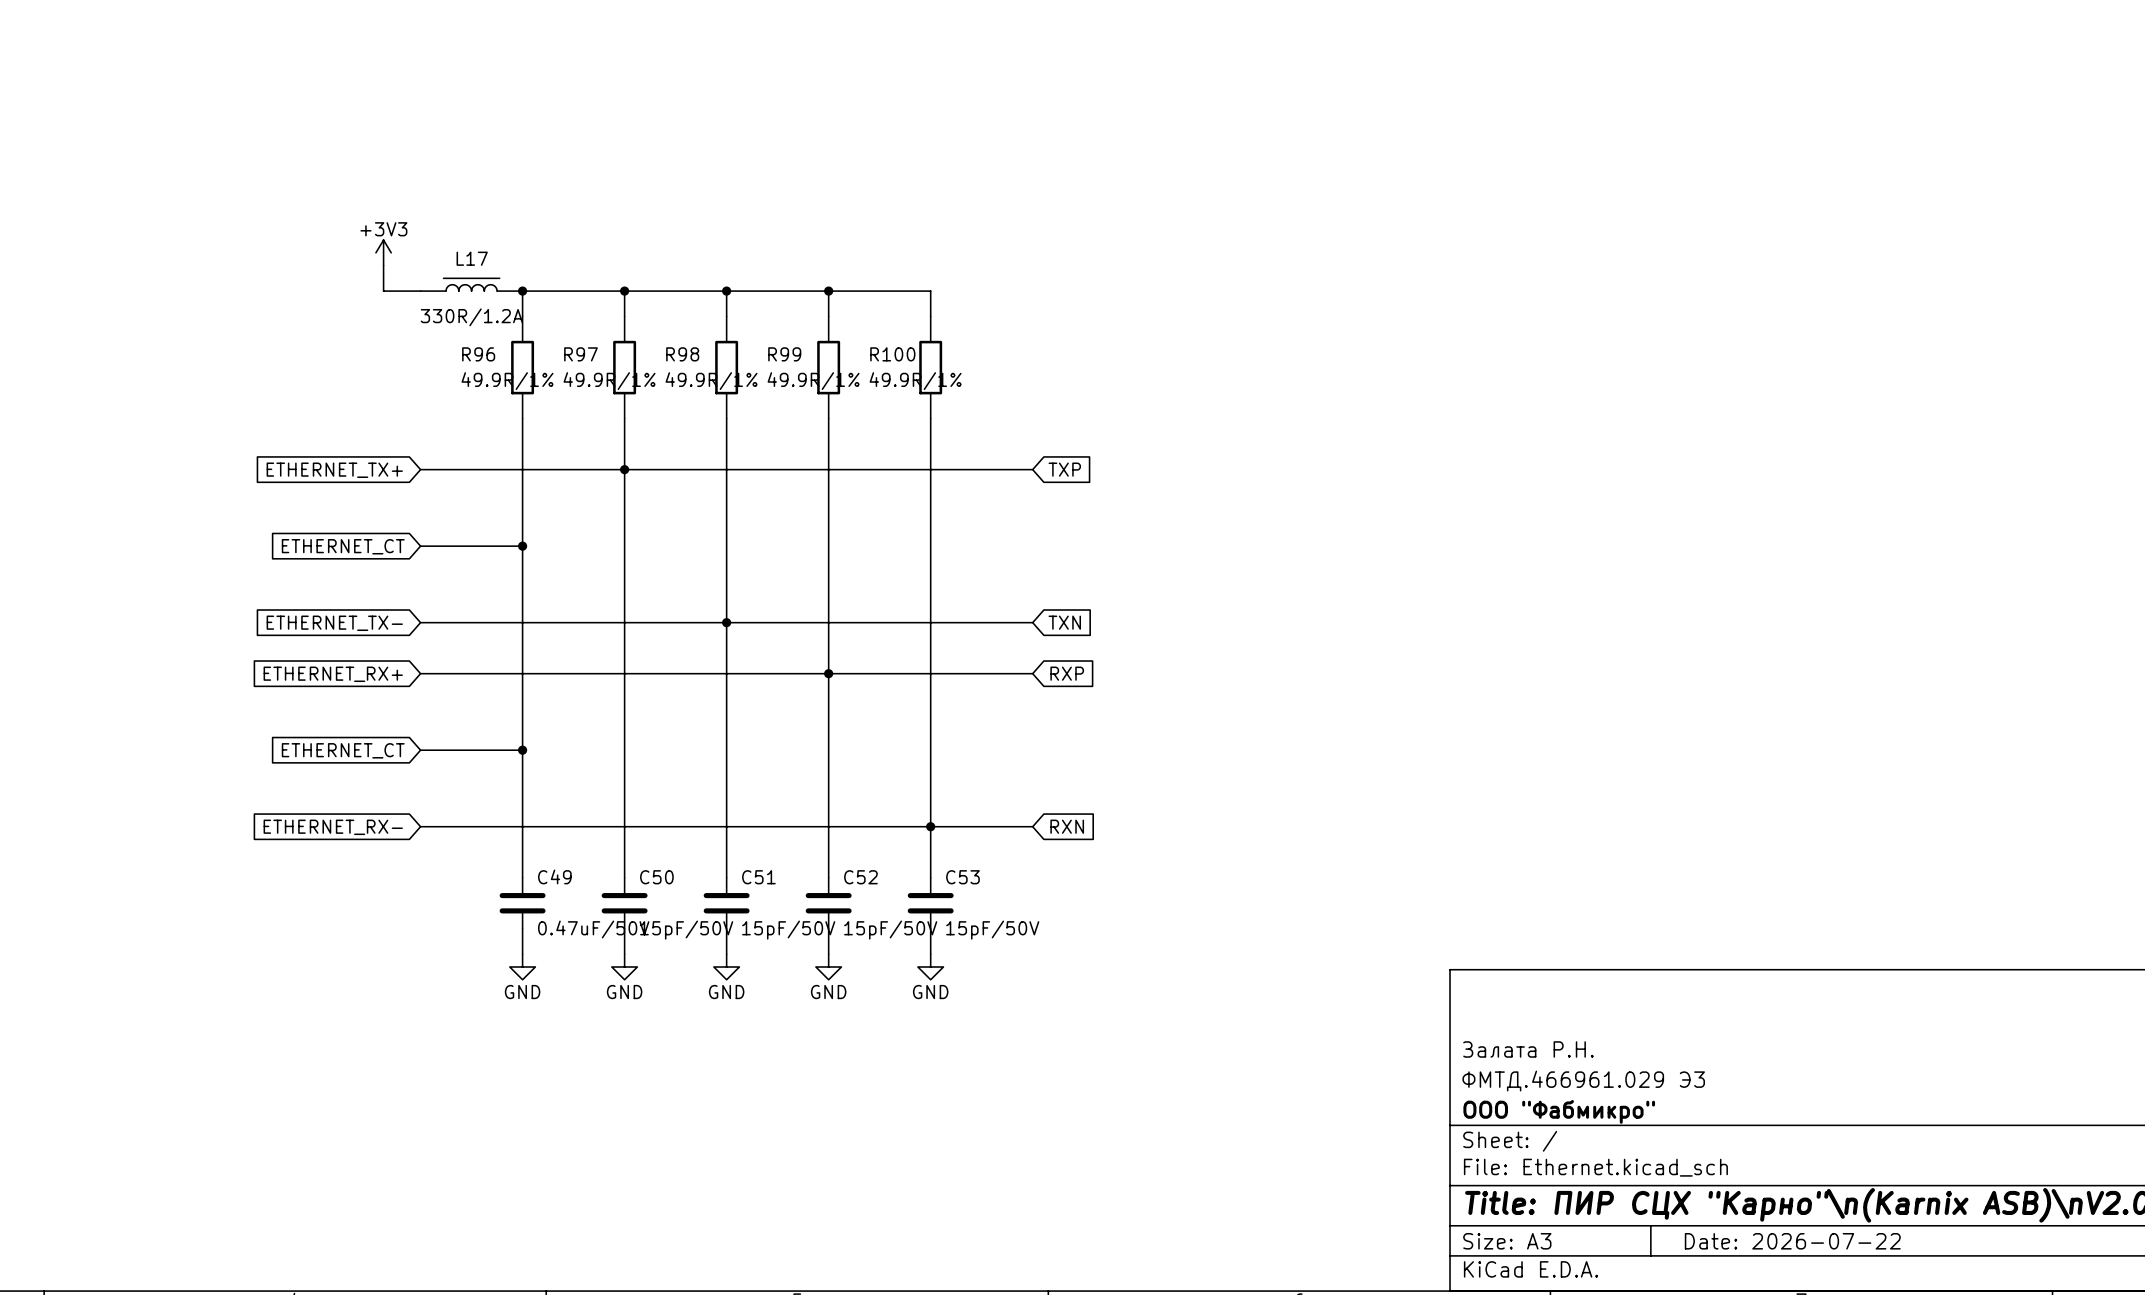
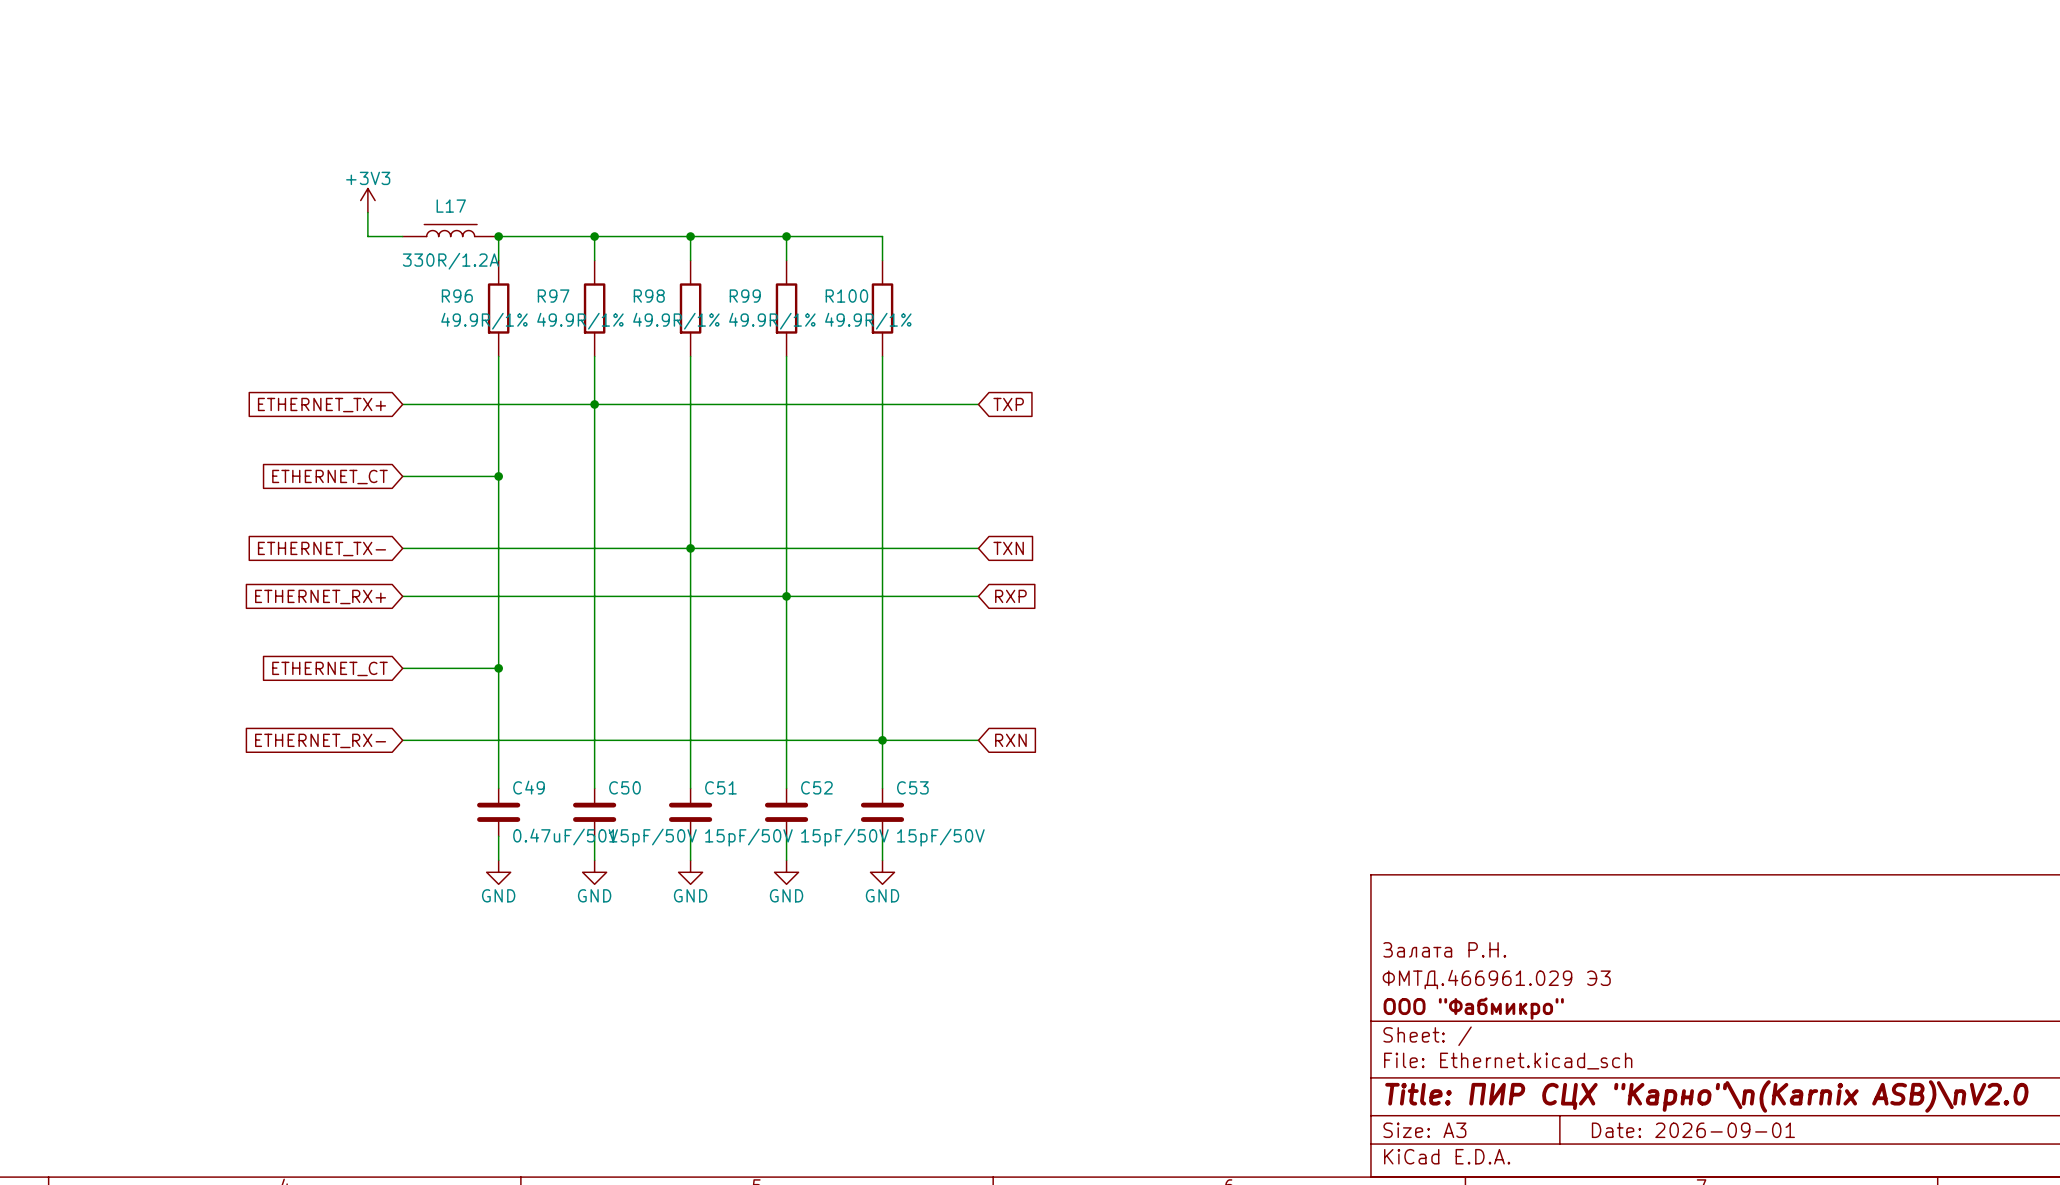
title block: Date: 2026-07-22 (1792, 1241) -> Date: 2026-09-01 (1693, 1130)

